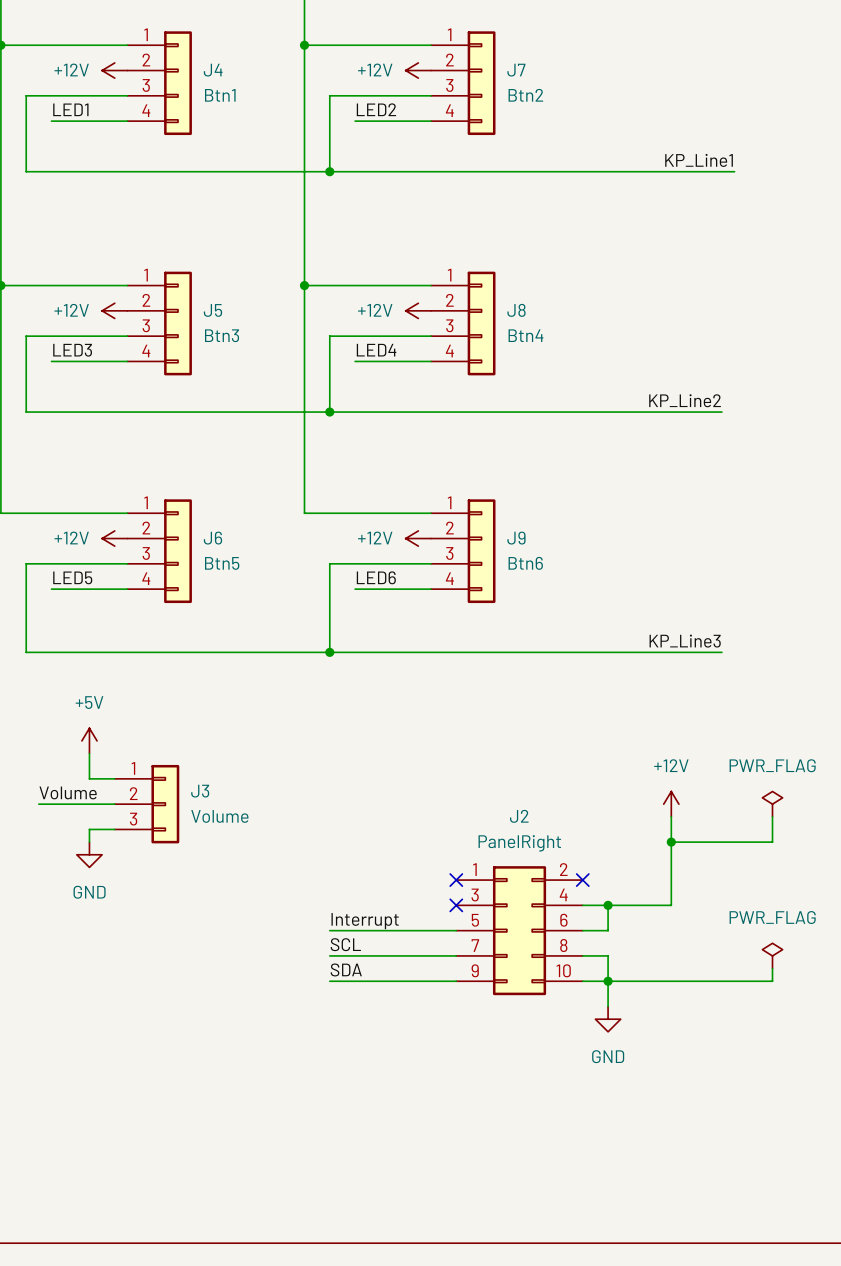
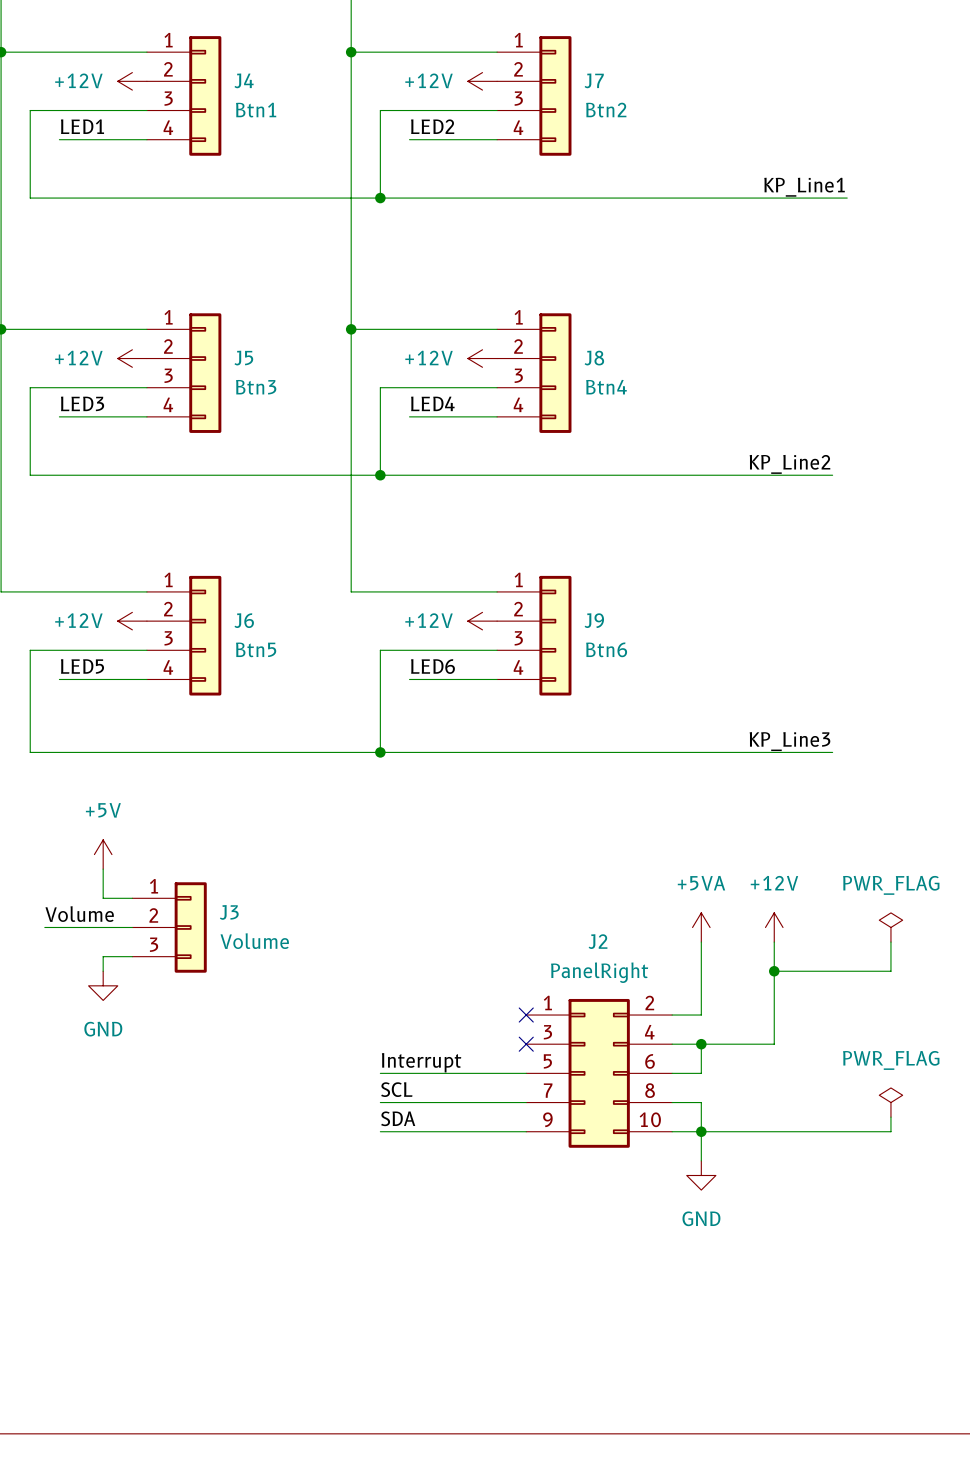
power symbol: none -> +5VA (701, 927)
wire: none -> (701, 942) (701, 1015) (672, 1015)
no-connect mark: (582, 880) -> none

